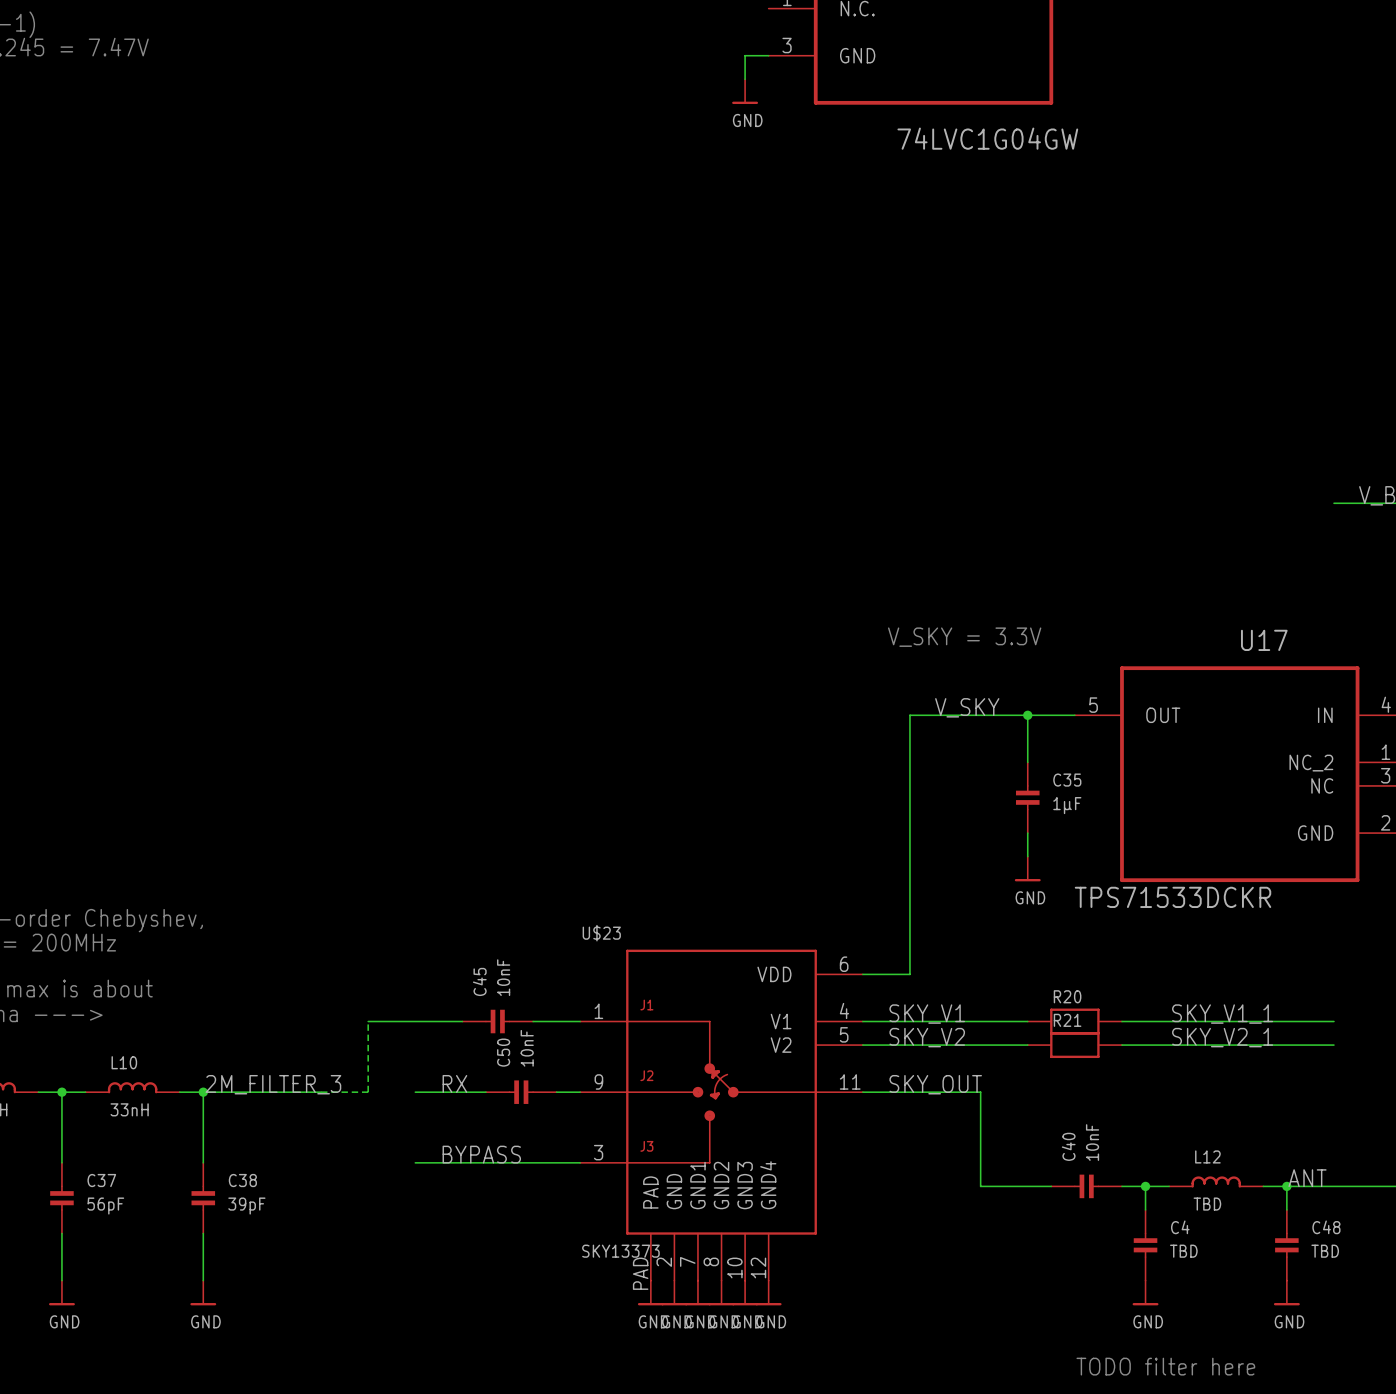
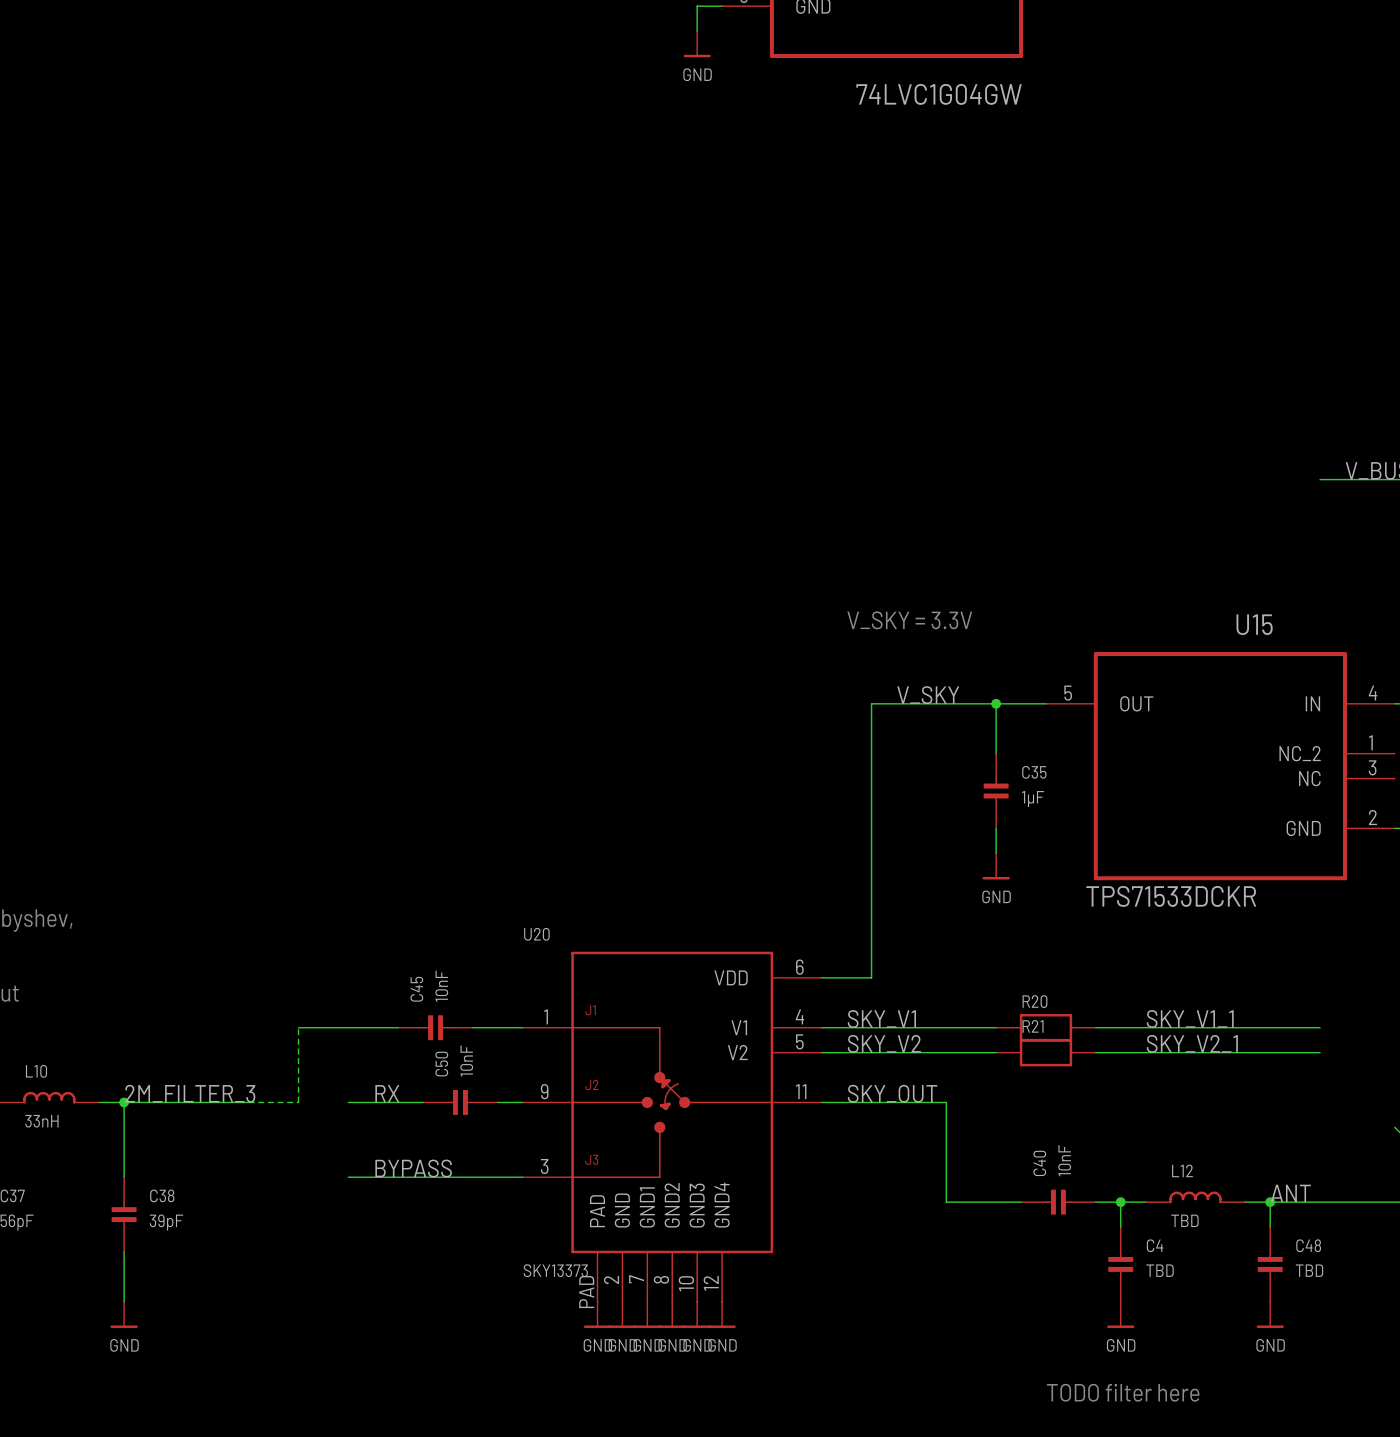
U17 name: U17 (1264, 640) -> U15 (1254, 624)
U$23 name: U$23 (601, 933) -> U20 (536, 934)

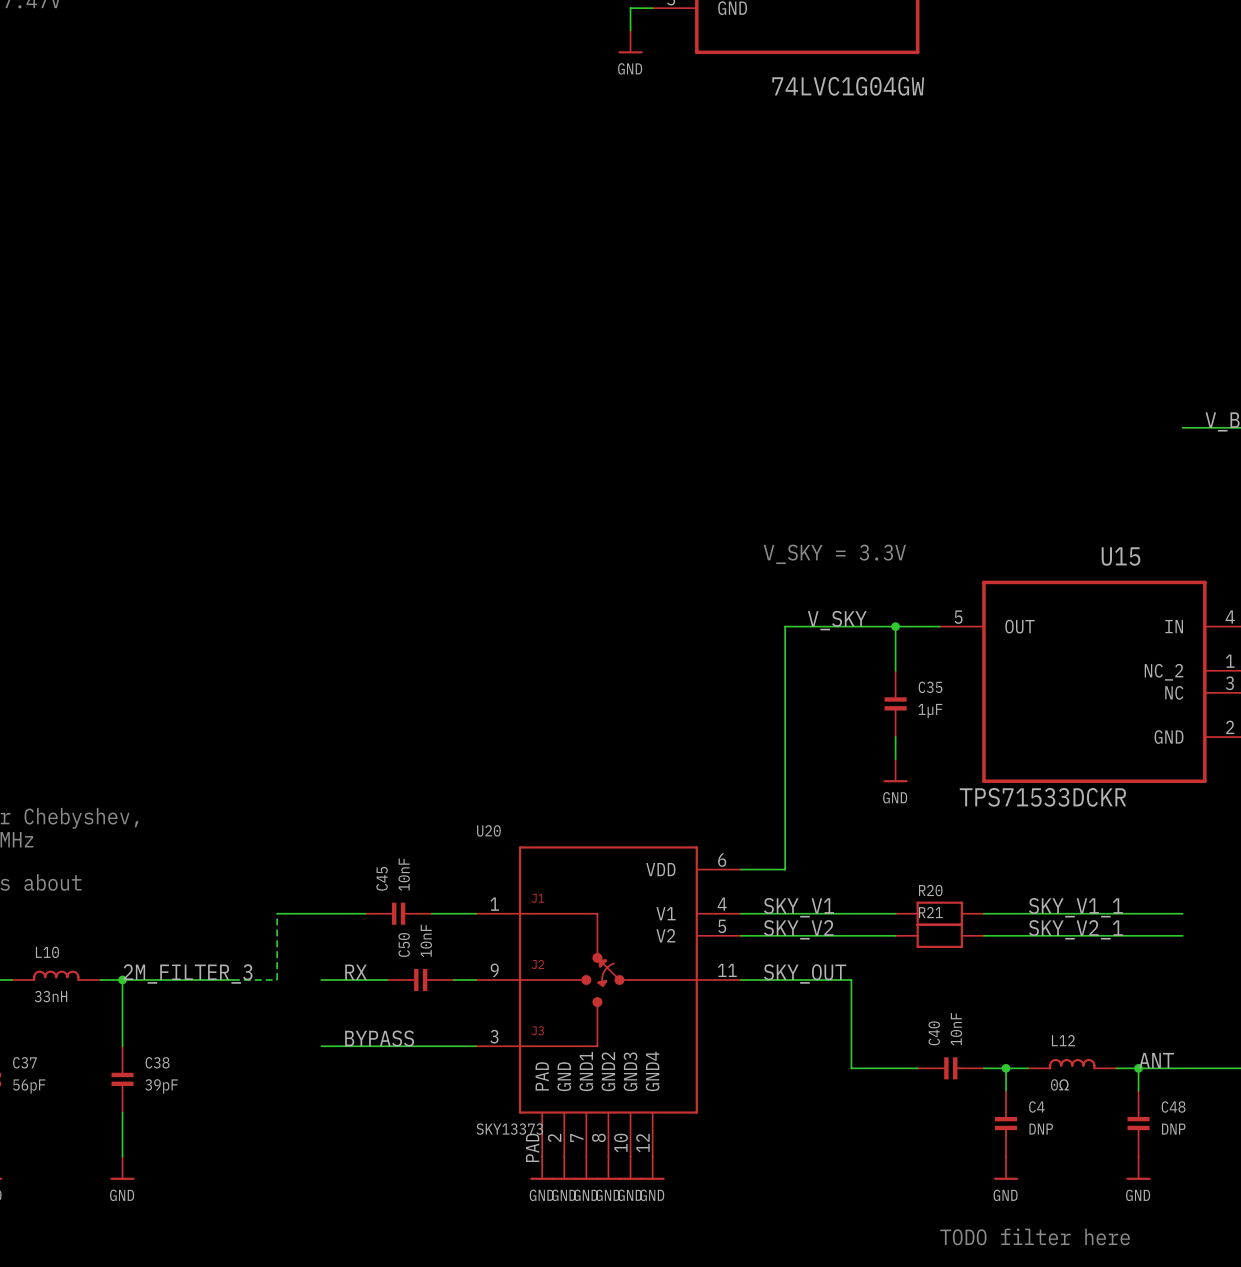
L12 value: TBD (1184, 1220) -> 0Ω (1059, 1084)
C4 value: TBD (1160, 1270) -> DNP (1041, 1129)
C48 value: TBD (1309, 1270) -> DNP (1173, 1129)

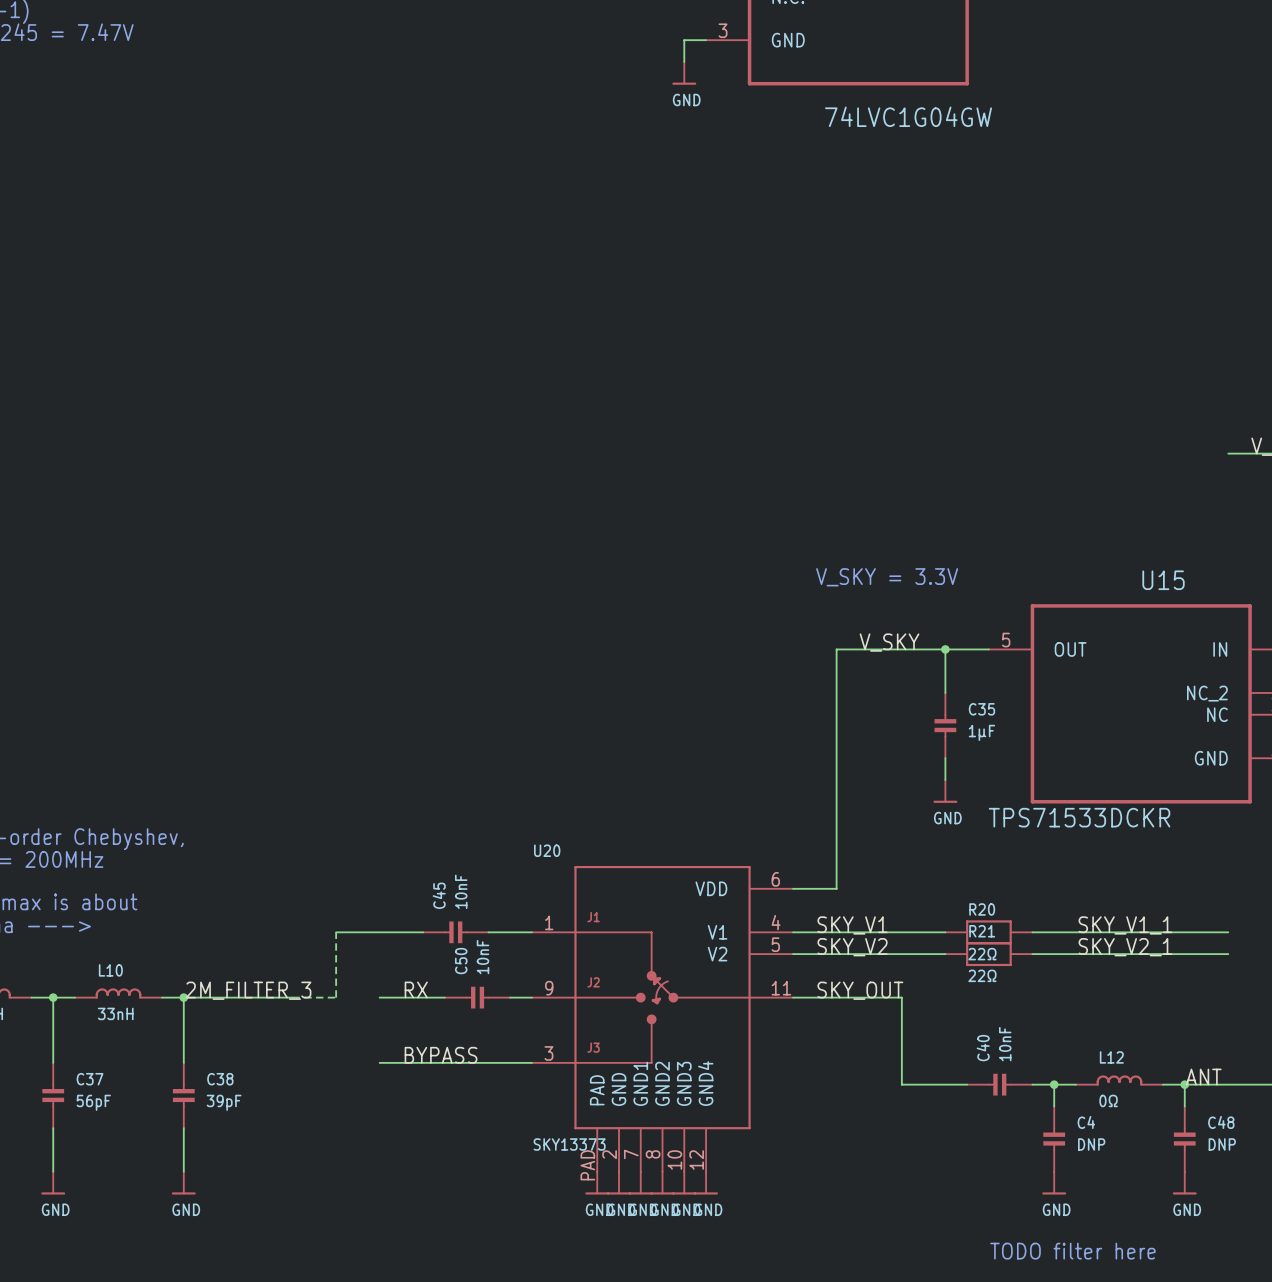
R20 value: none -> 22Ω (982, 954)
R21 value: none -> 22Ω (982, 975)

